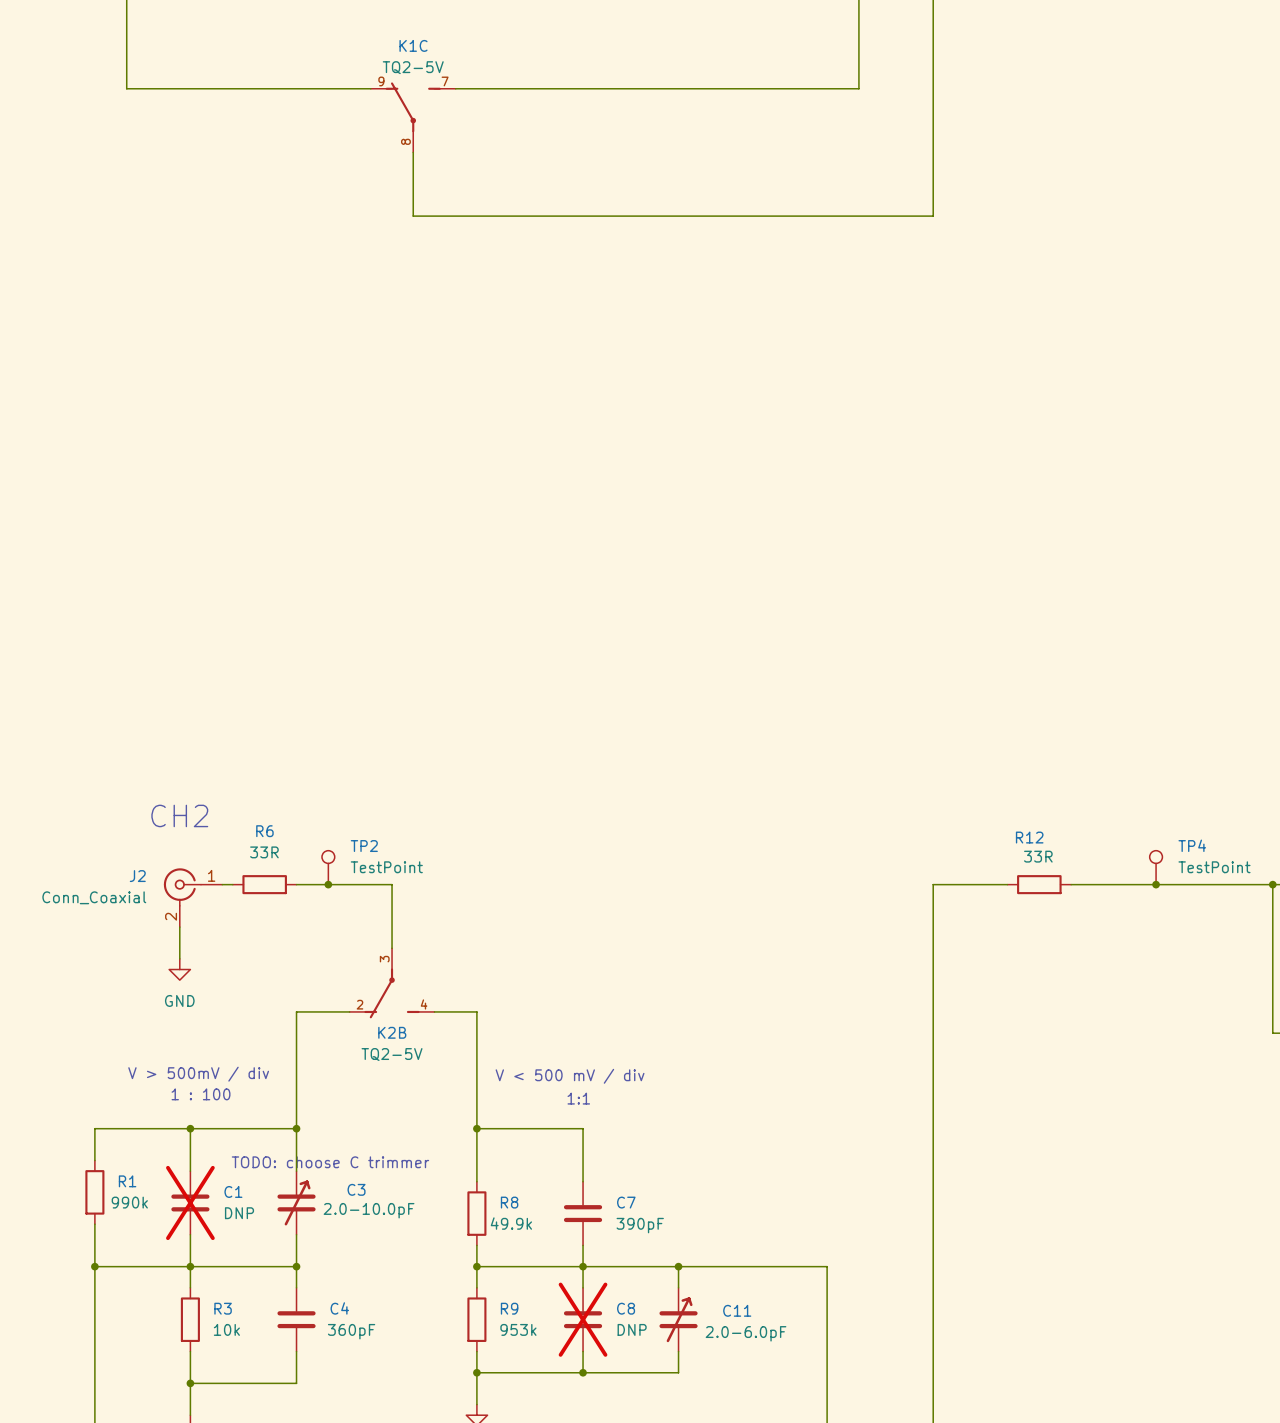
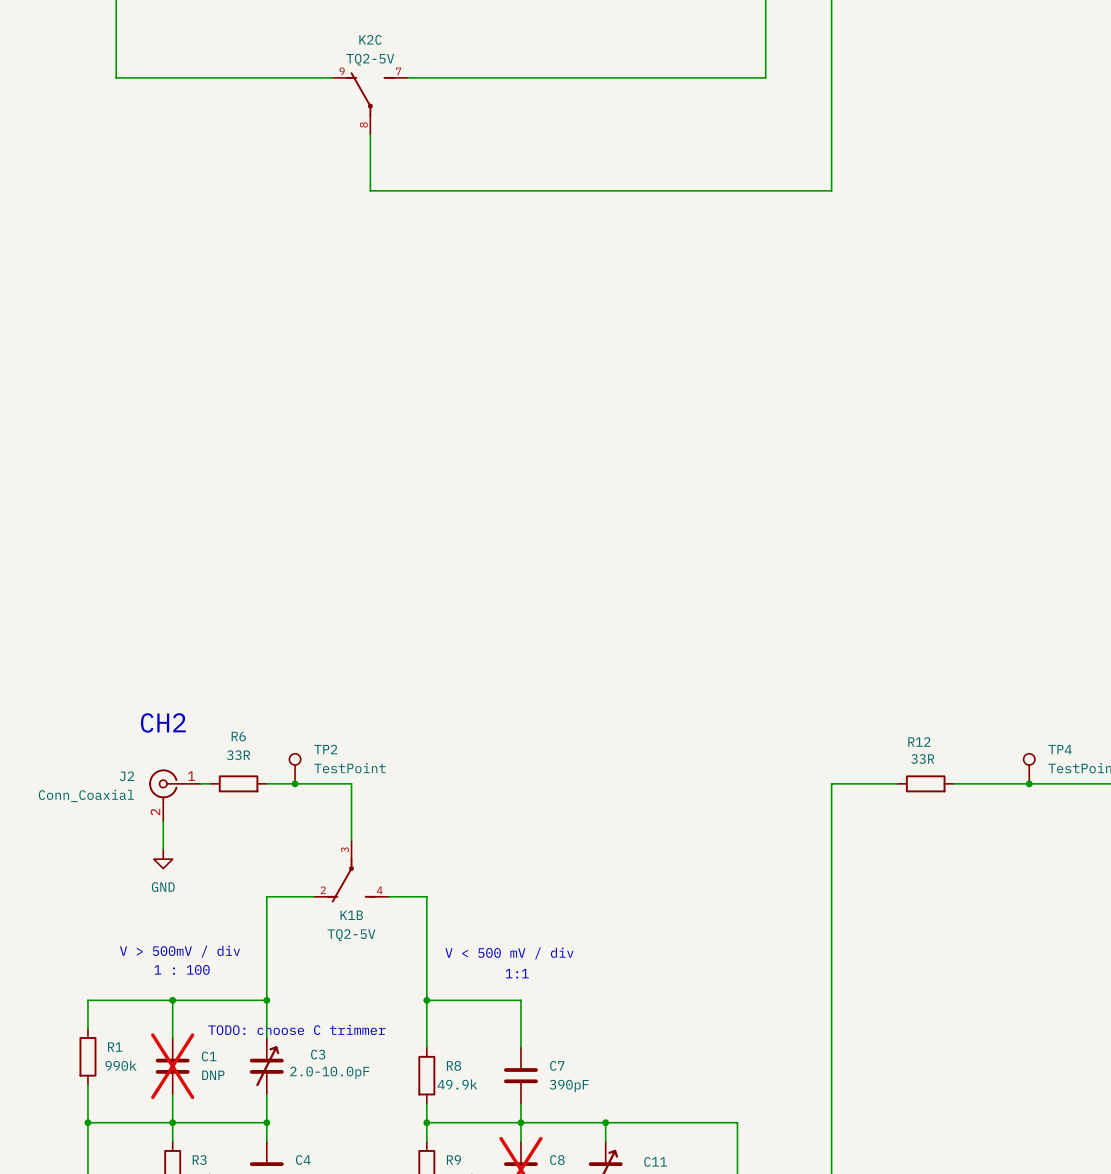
K1C name: K1C (413, 45) -> K2C (370, 39)
K2B name: K2B (392, 1032) -> K1B (351, 915)

